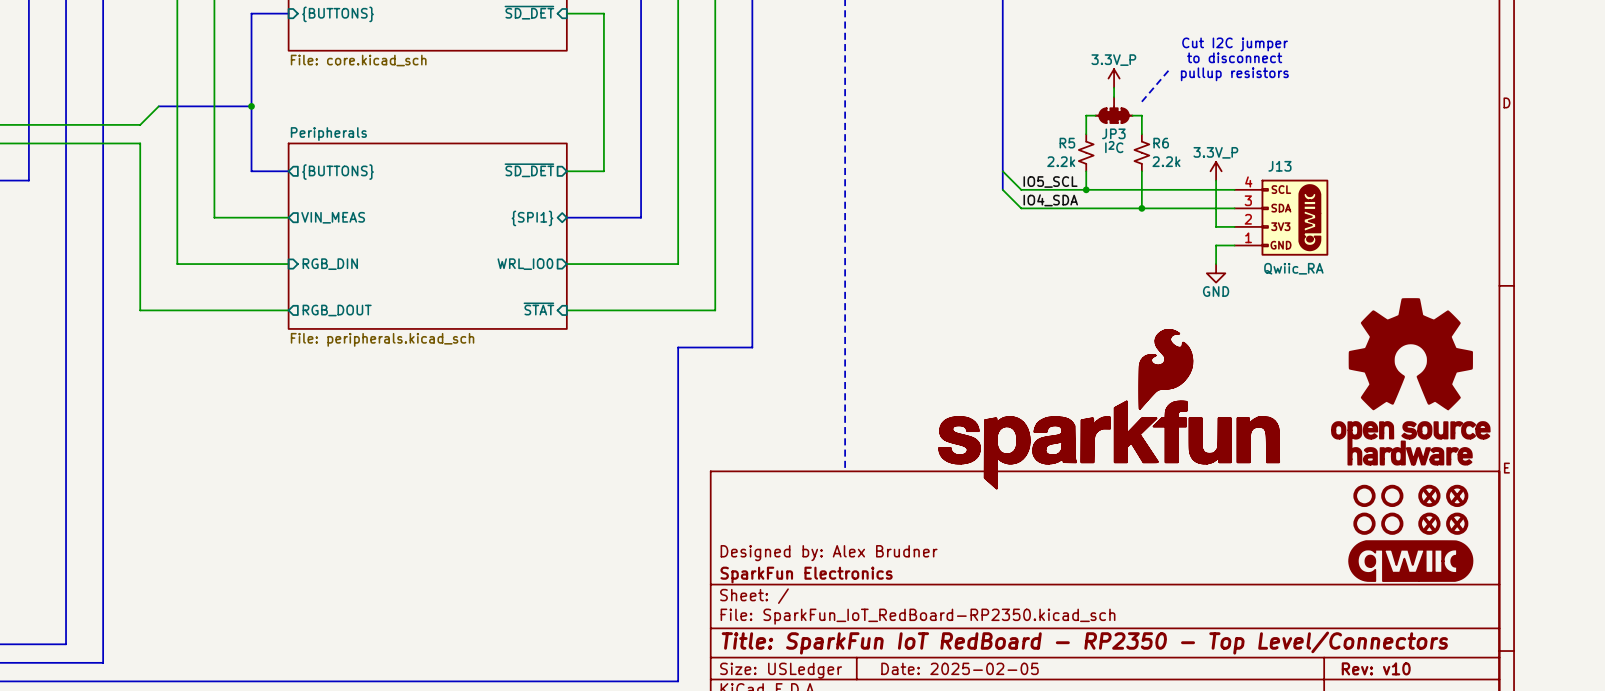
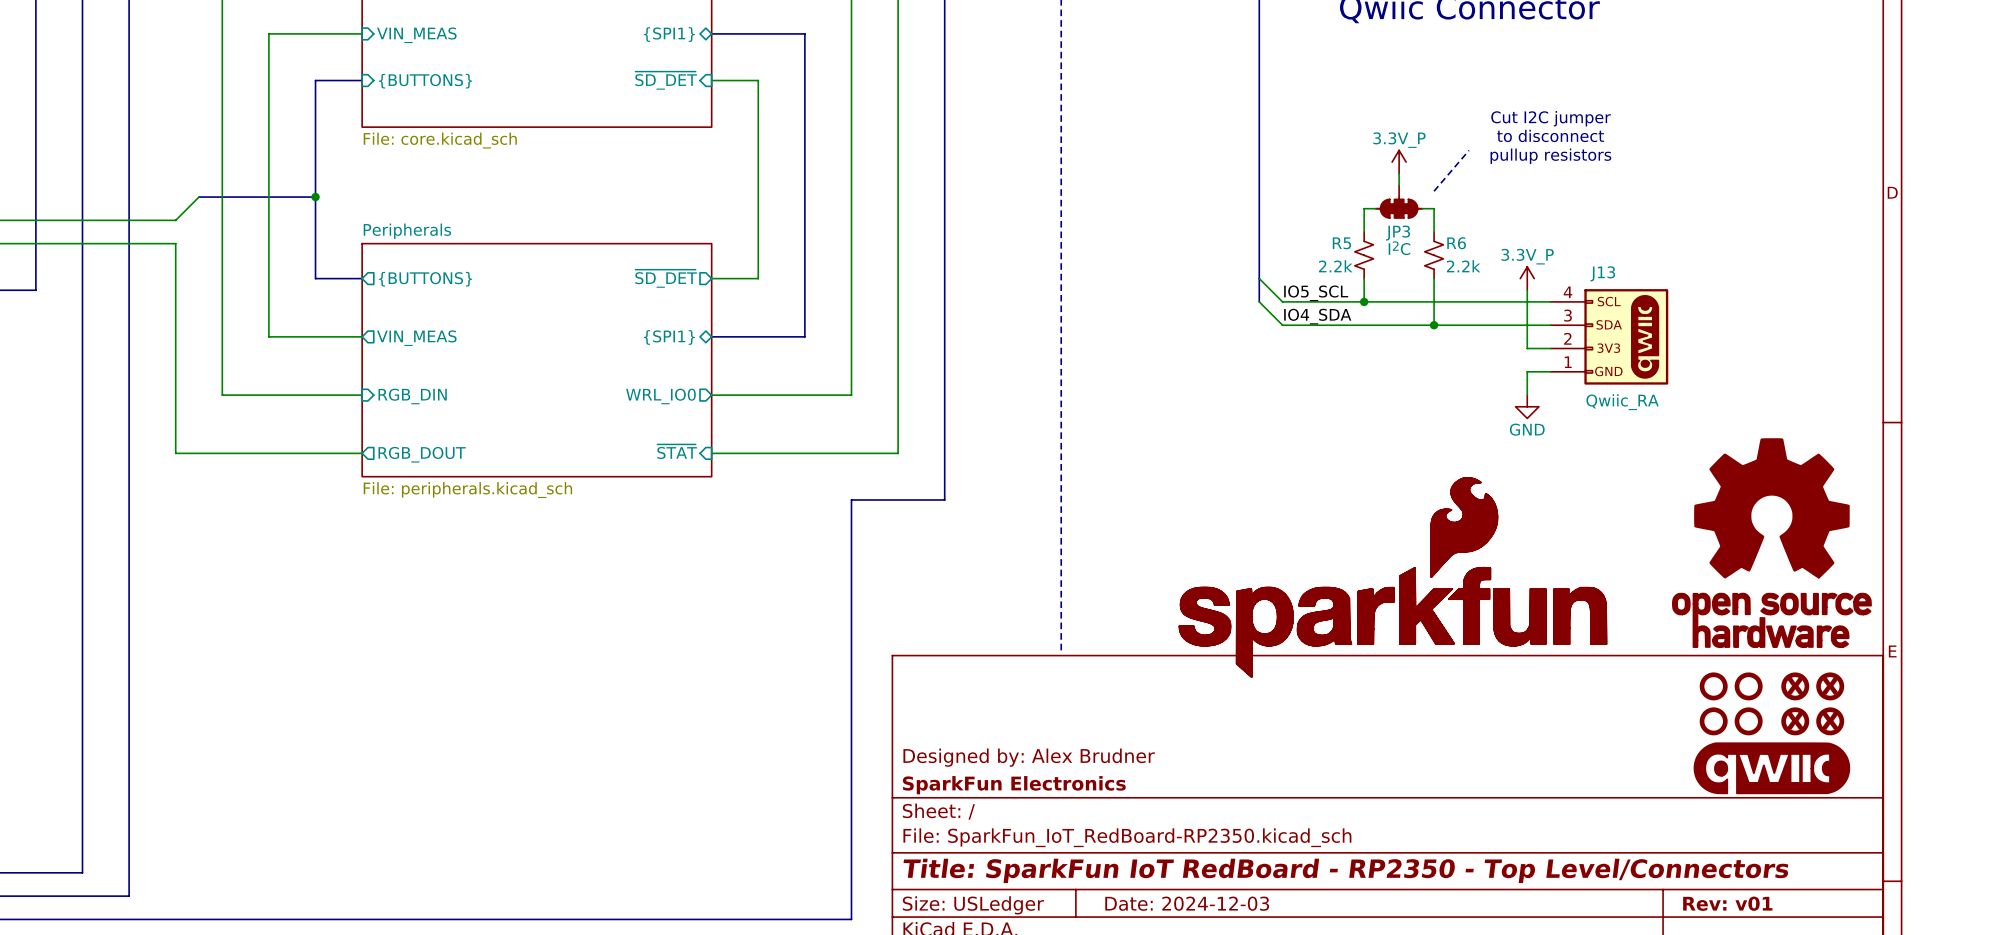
title block: Date: 2025-02-05 (960, 668) -> Date: 2024-12-03 (1187, 903)
title block: Rev: v10 (1376, 668) -> Rev: v01 (1727, 903)

